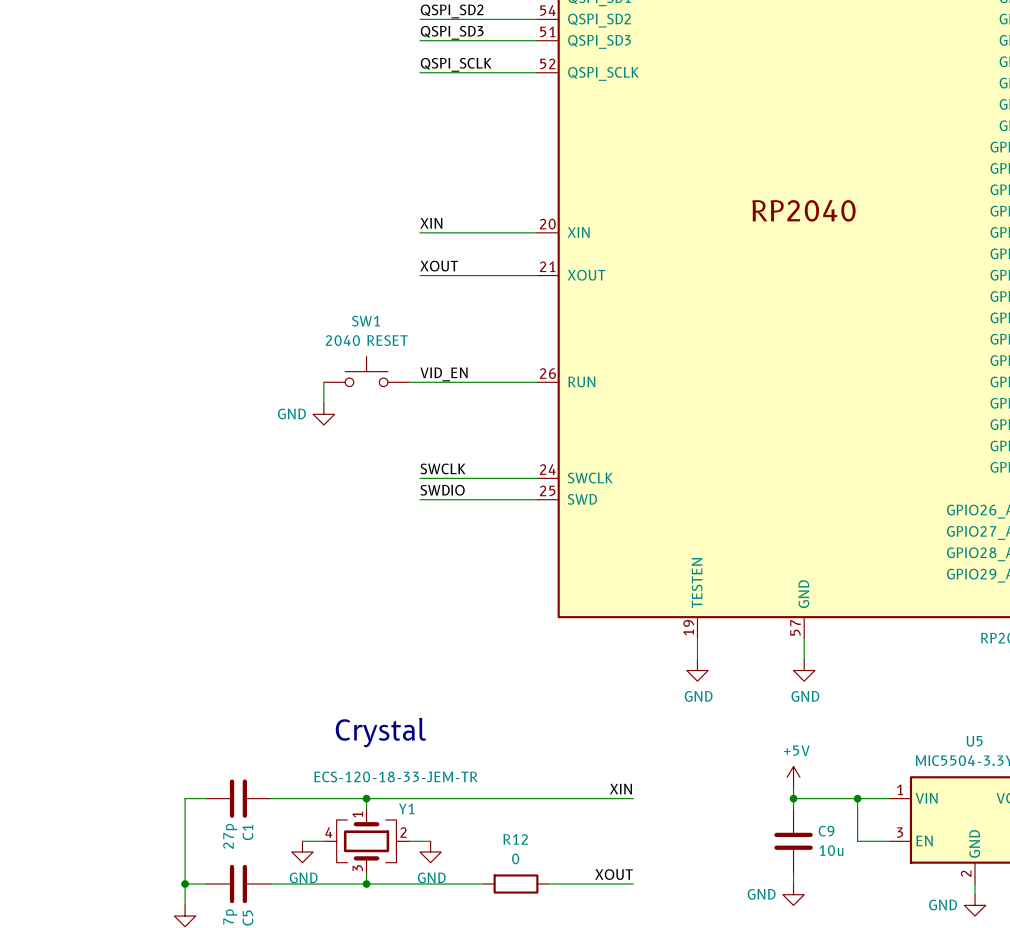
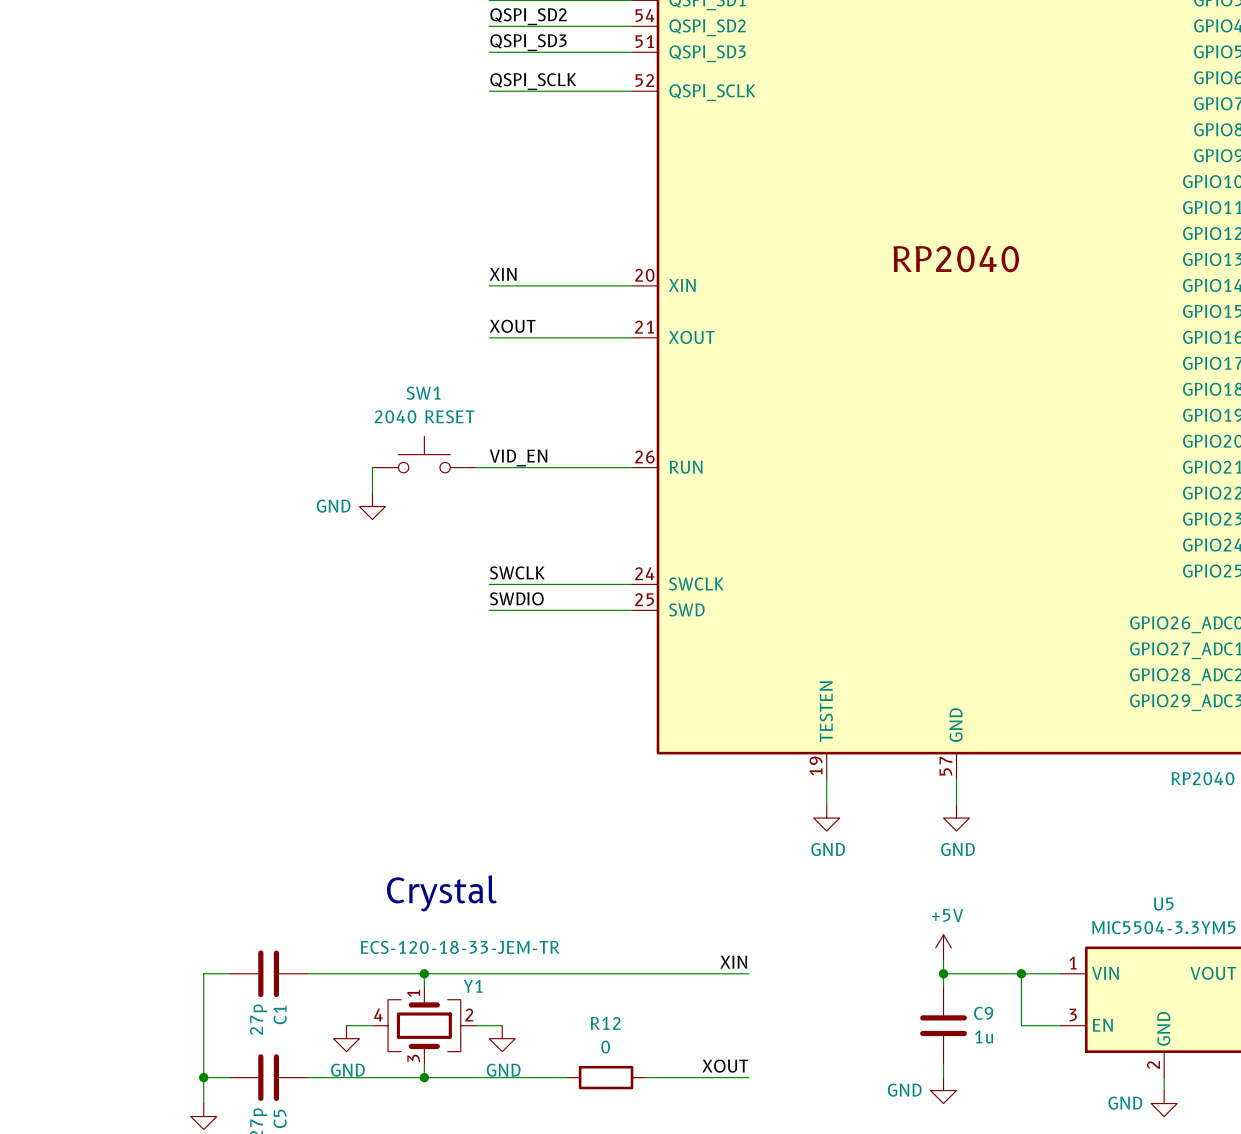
C9 value: 10u (831, 850) -> 1u (984, 1036)

